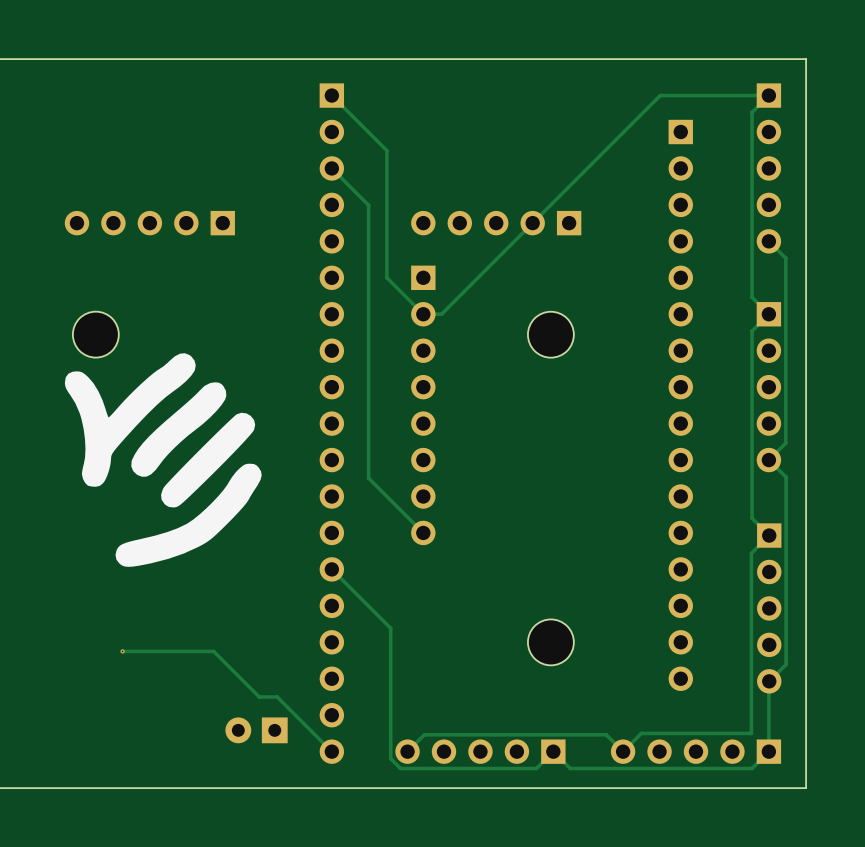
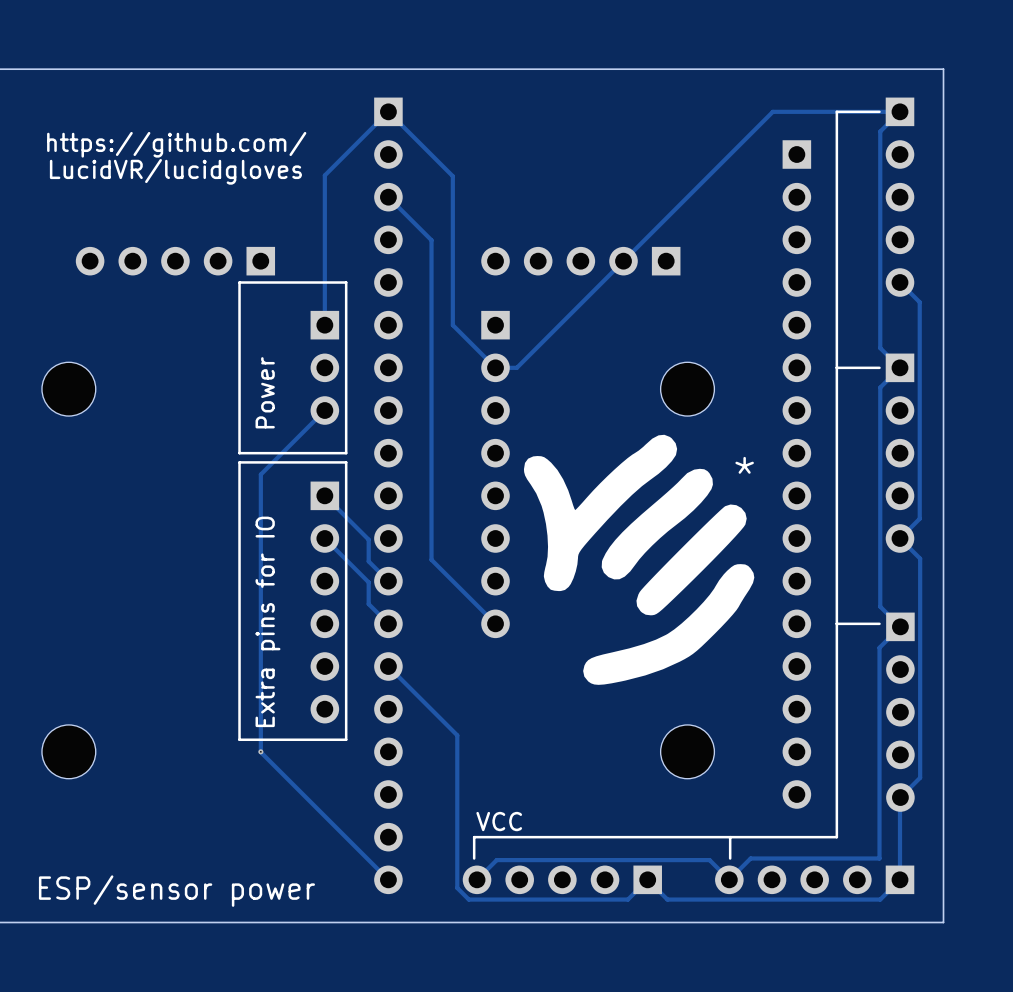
track: none -> (388, 111) (324, 175) (324, 325)
line: none -> (879, 111) (836, 111) (836, 837) (474, 837) (474, 858)
text: none -> https://github.com/ (176, 144)
text: none -> LucidVR/lucidgloves (175, 171)
line: none -> (346, 282) (346, 453) (239, 453) (239, 282) (346, 282)
part: none -> (324, 367)
line: none -> (879, 367) (836, 367)
part position: (95, 334) -> (68, 389)
part position: (550, 334) -> (687, 389)
text: none -> Power (265, 392)
drawing: [64, 353, 262, 567] -> none
drawing: none -> [523, 434, 755, 685]
line: none -> (346, 462) (239, 462) (239, 739) (346, 739) (346, 462)
text: none -> * (744, 465)
track: none -> (324, 495) (368, 539) (368, 561) (388, 581)
track: none -> (324, 538) (368, 582) (368, 604) (388, 623)
part: none -> (324, 602)
text: none -> Extra pins for IO (267, 621)
line: none -> (879, 623) (836, 623)
part: none -> (68, 751)
via: none -> (260, 751)
part position: (550, 642) -> (687, 751)
track: (122, 651) (213, 651) (259, 696) (277, 696) -> (324, 410) (260, 474) (260, 752) (324, 815)
via: (122, 651) -> none
text: none -> VCC (499, 821)
line: none -> (730, 837) (730, 858)
part: (256, 730) -> none
text: none -> ESP/sensor power (176, 891)

